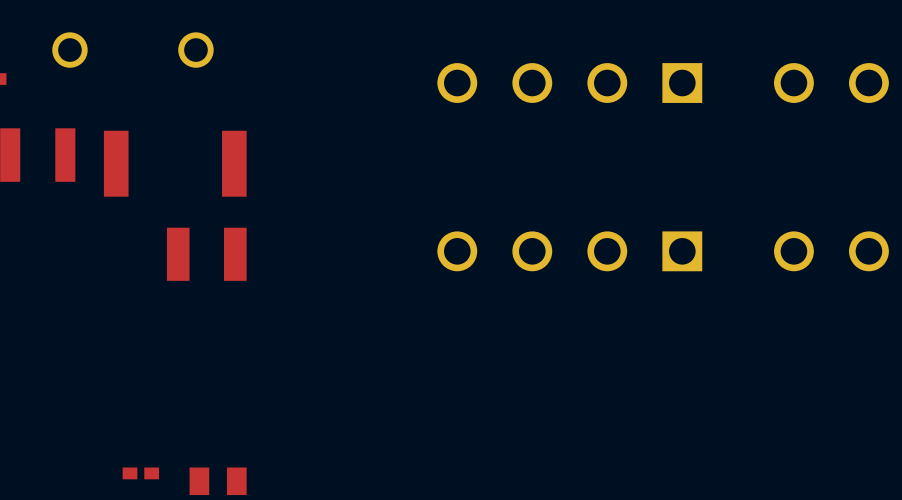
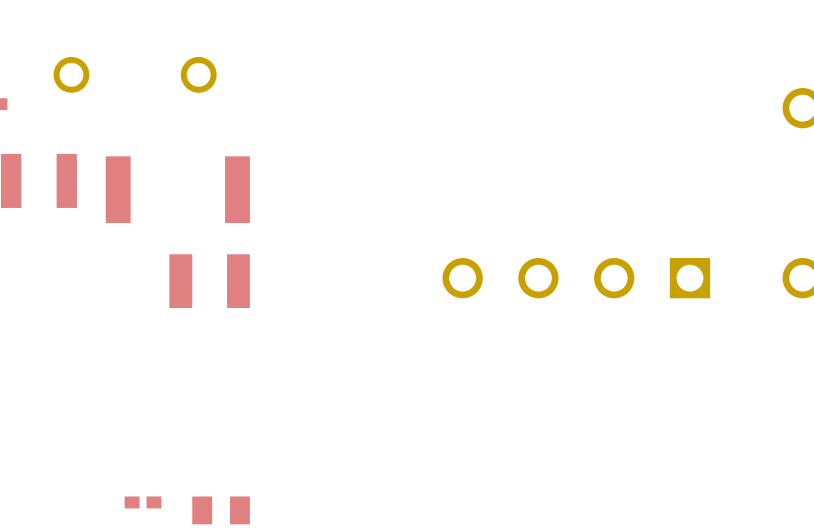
part: (569, 83) -> none

